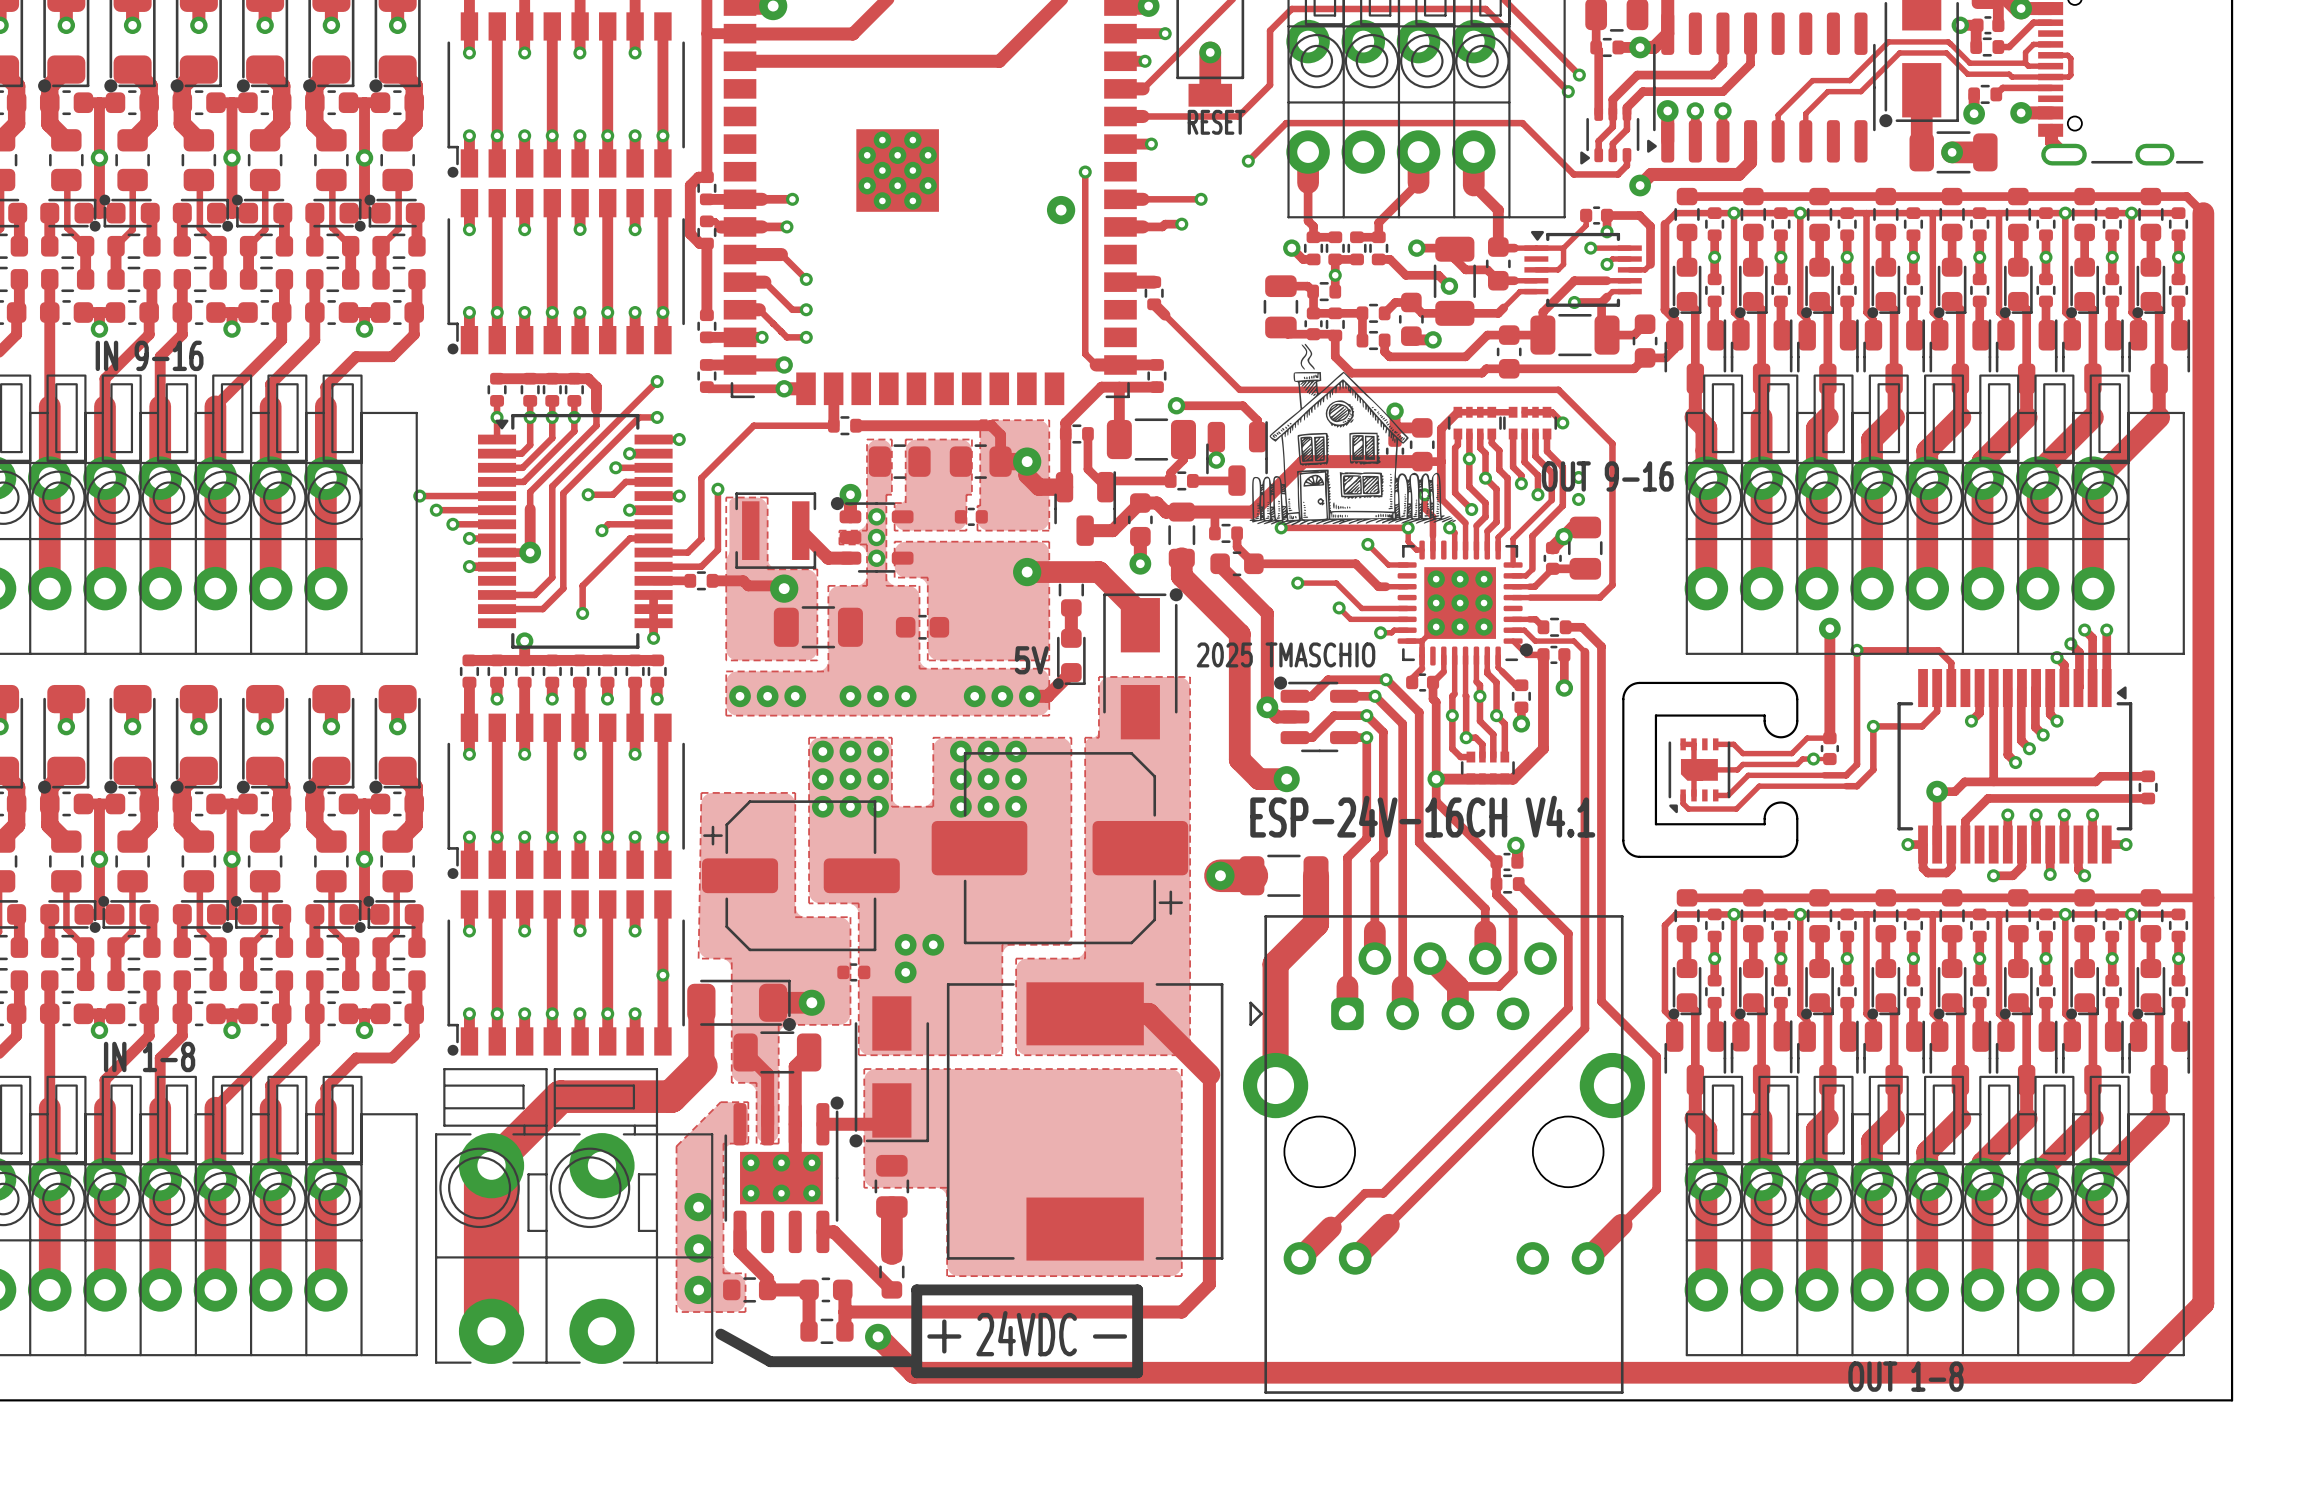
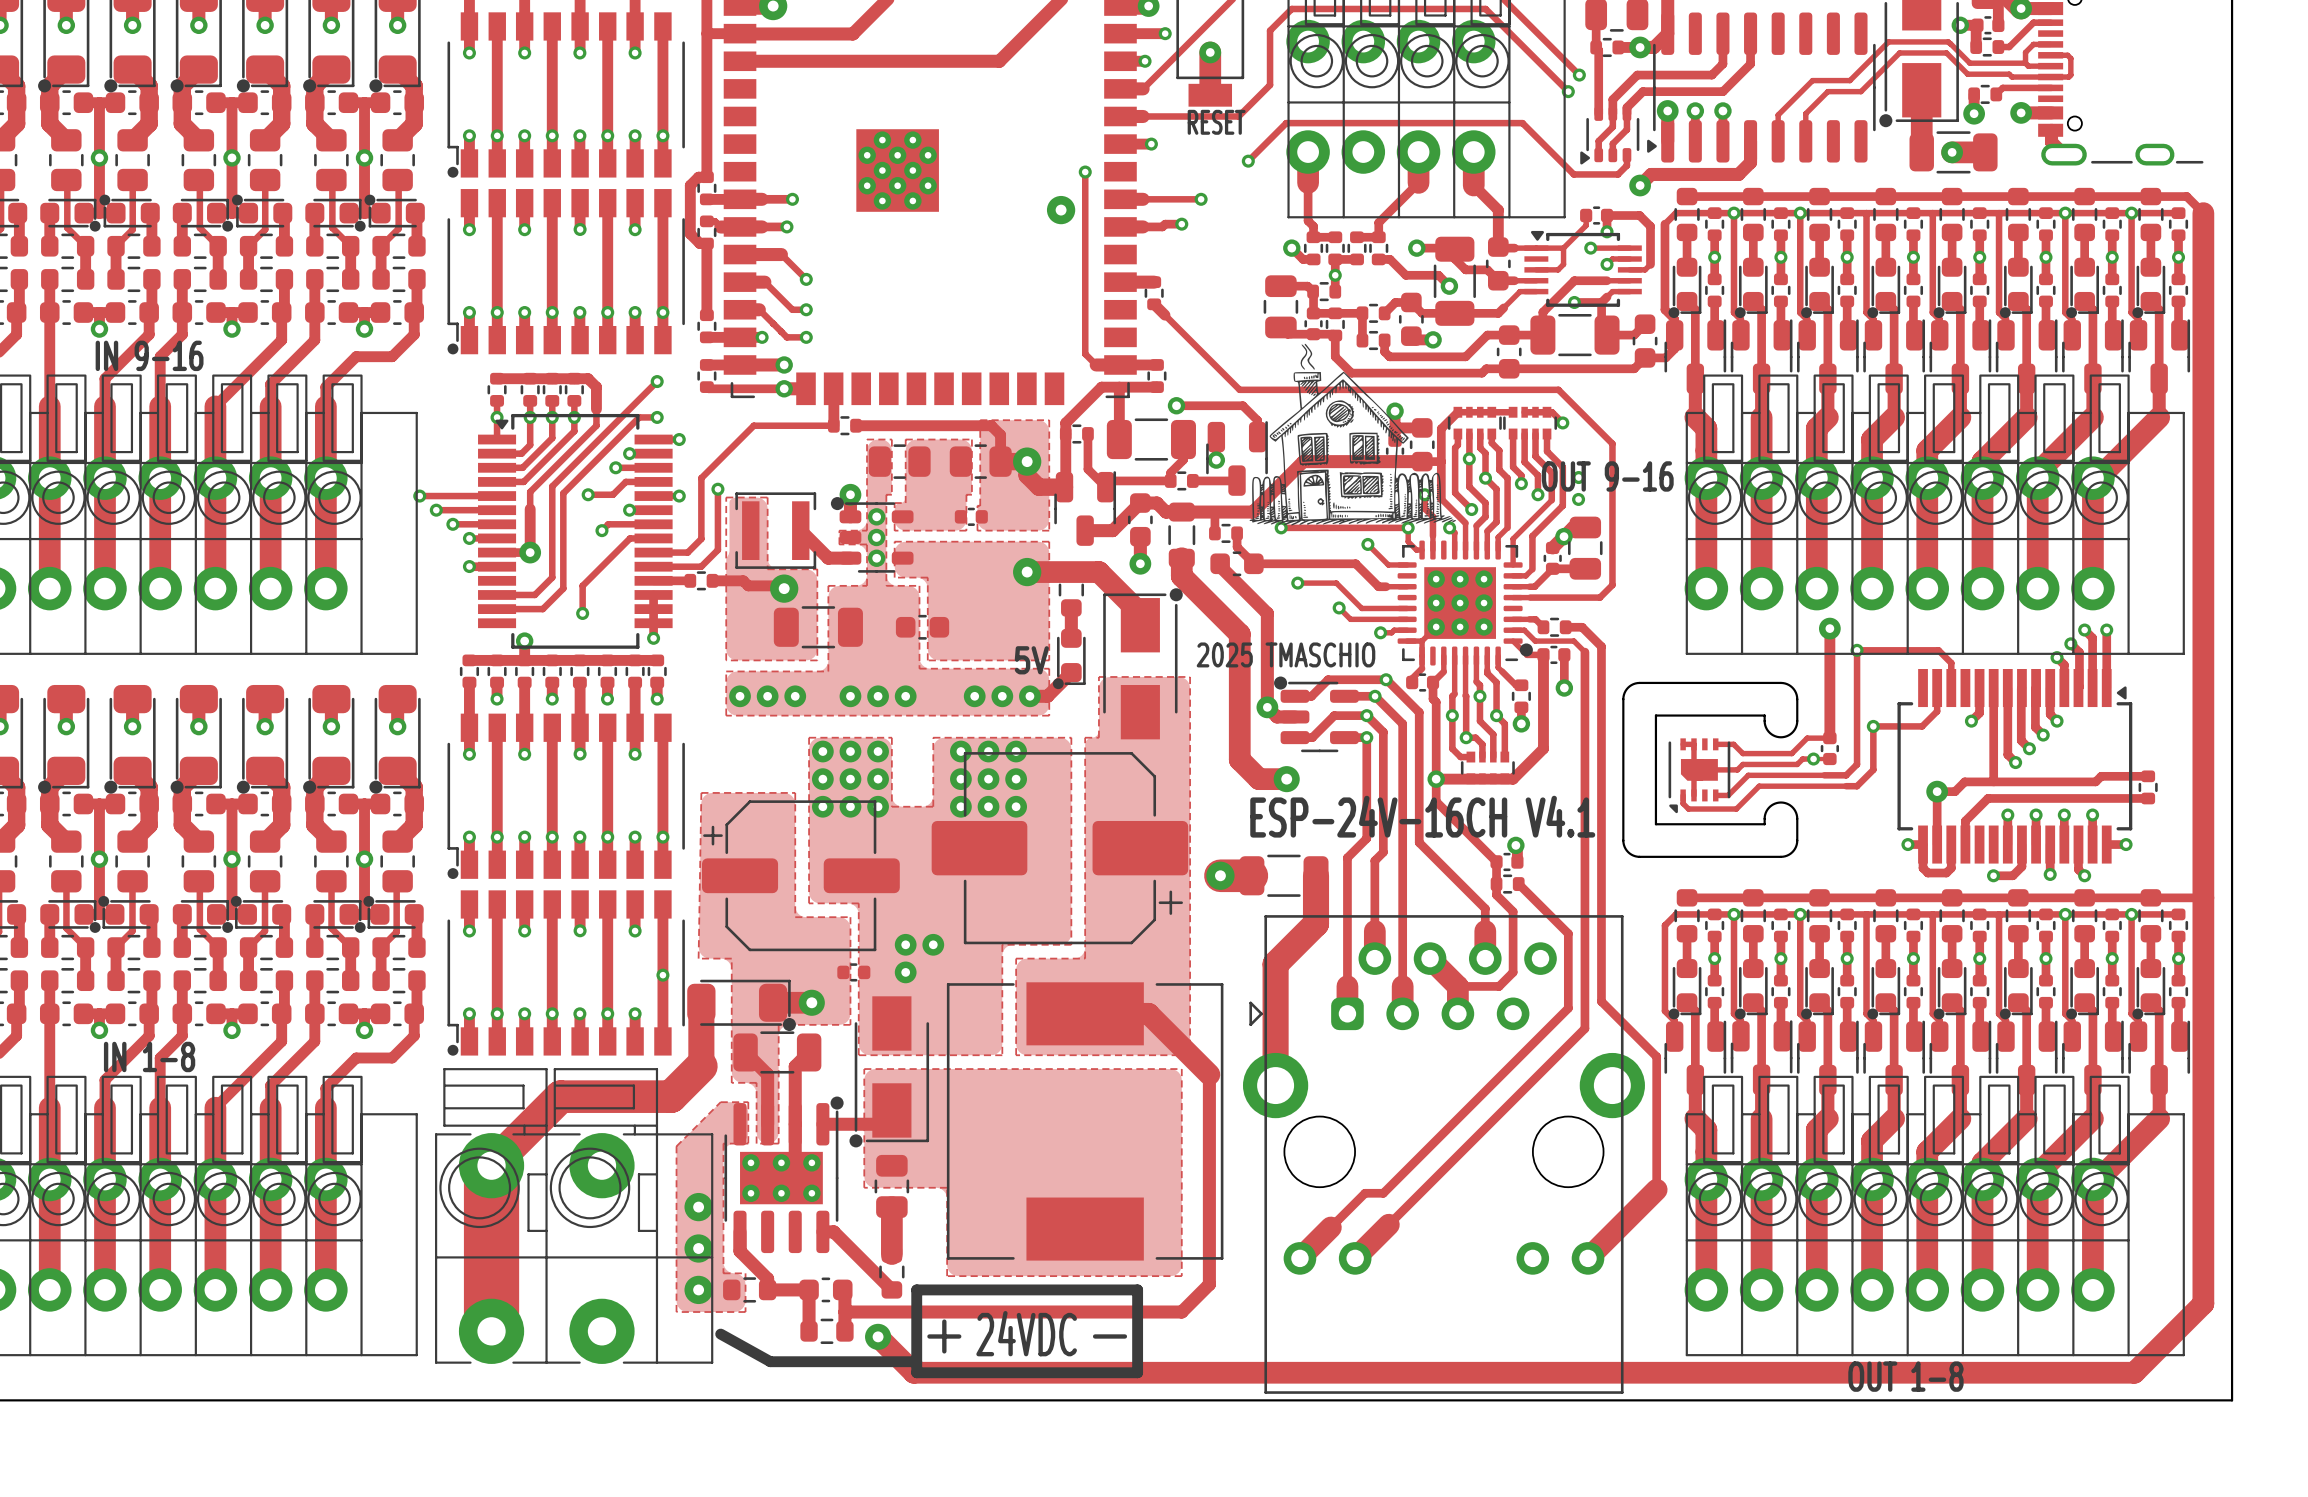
track width: thin (1656, 1189) (1621, 1224) -> thick (1656, 1189) (1621, 1224)

